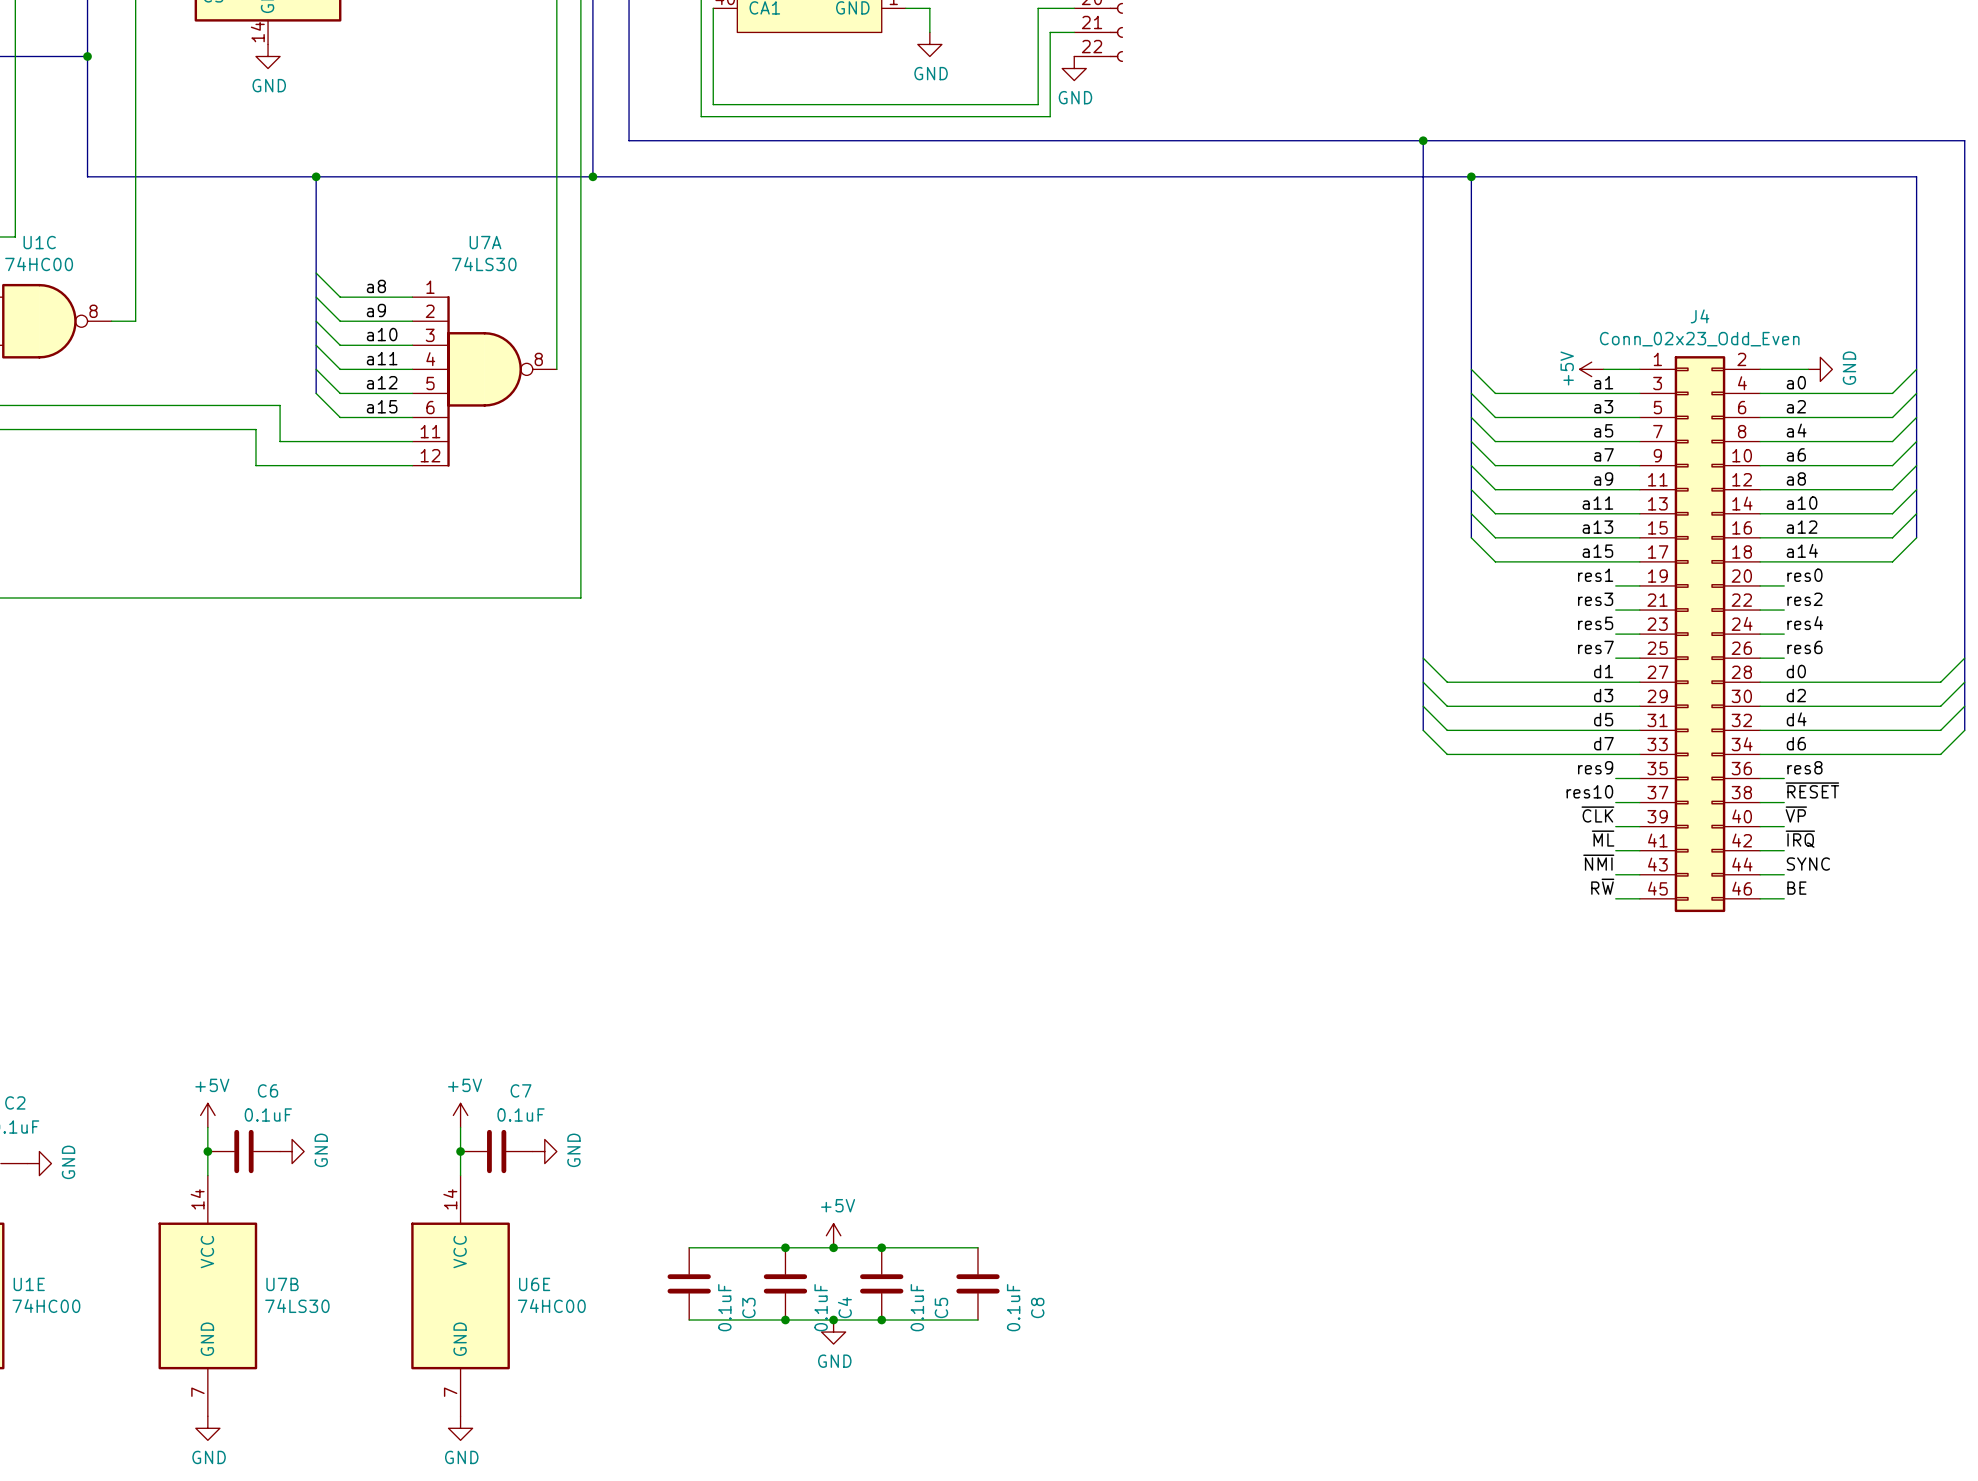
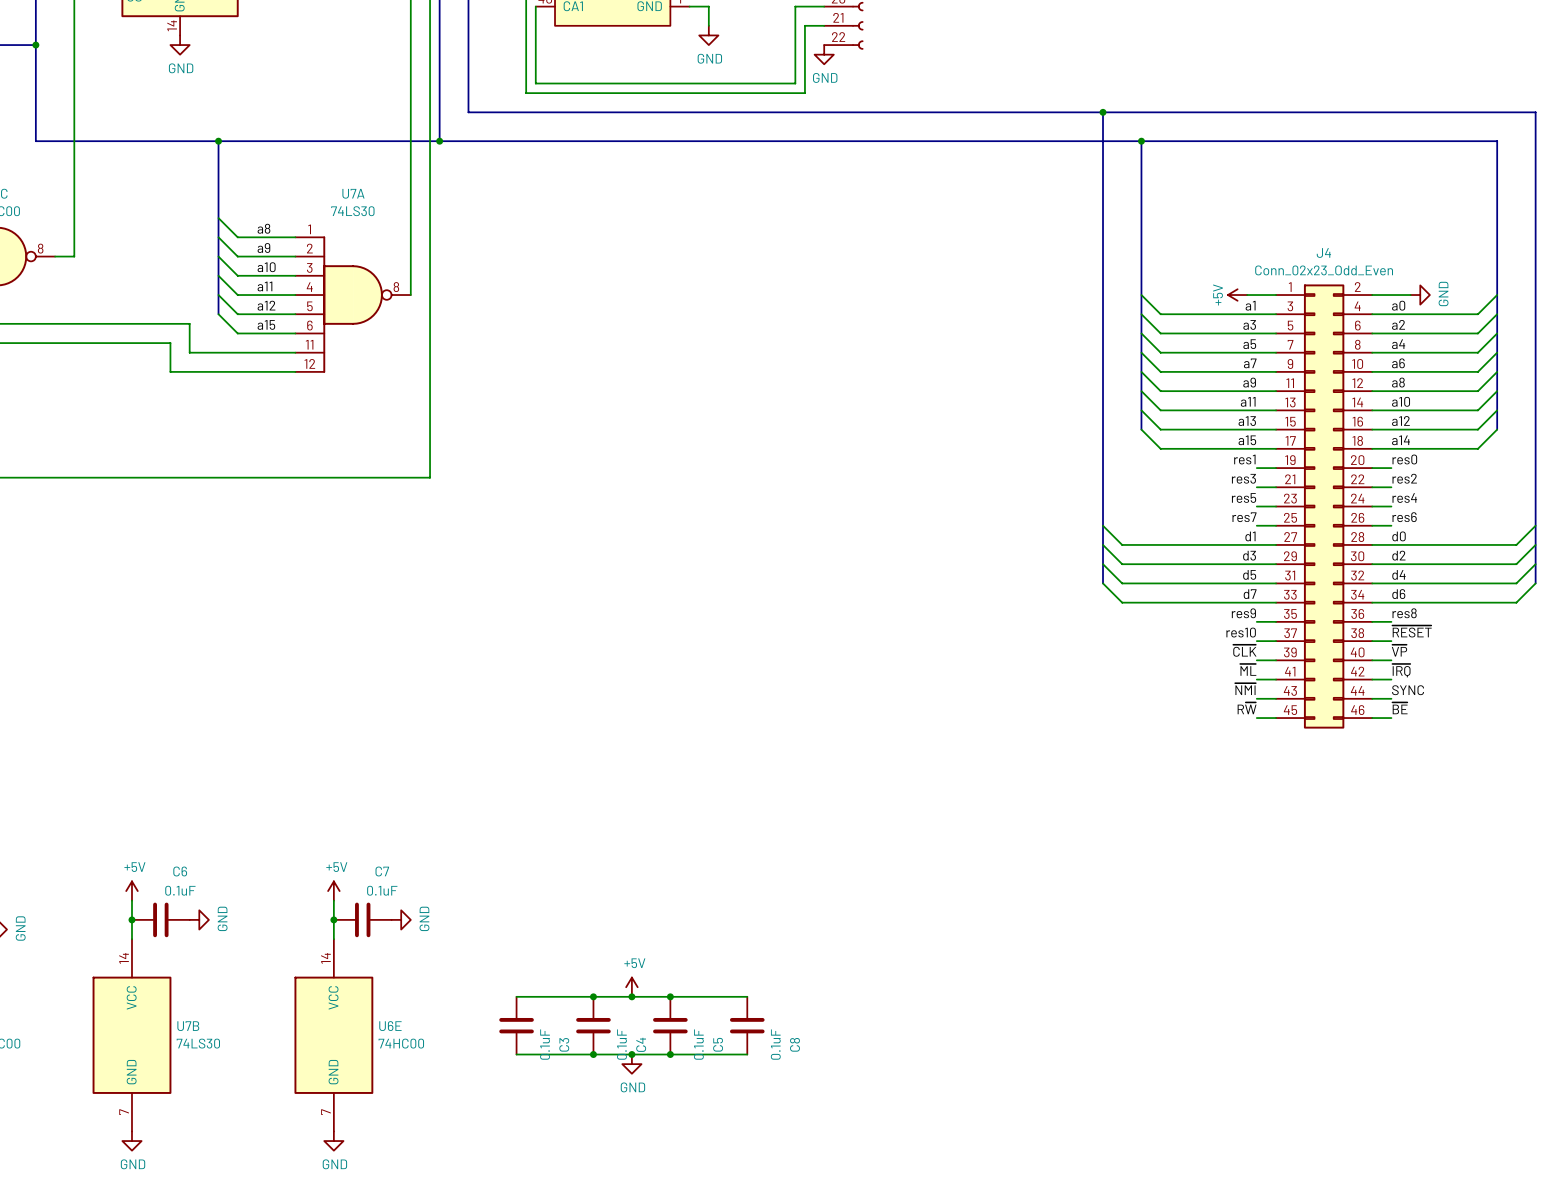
label: BE (1796, 888) -> ~{BE} (1399, 708)

